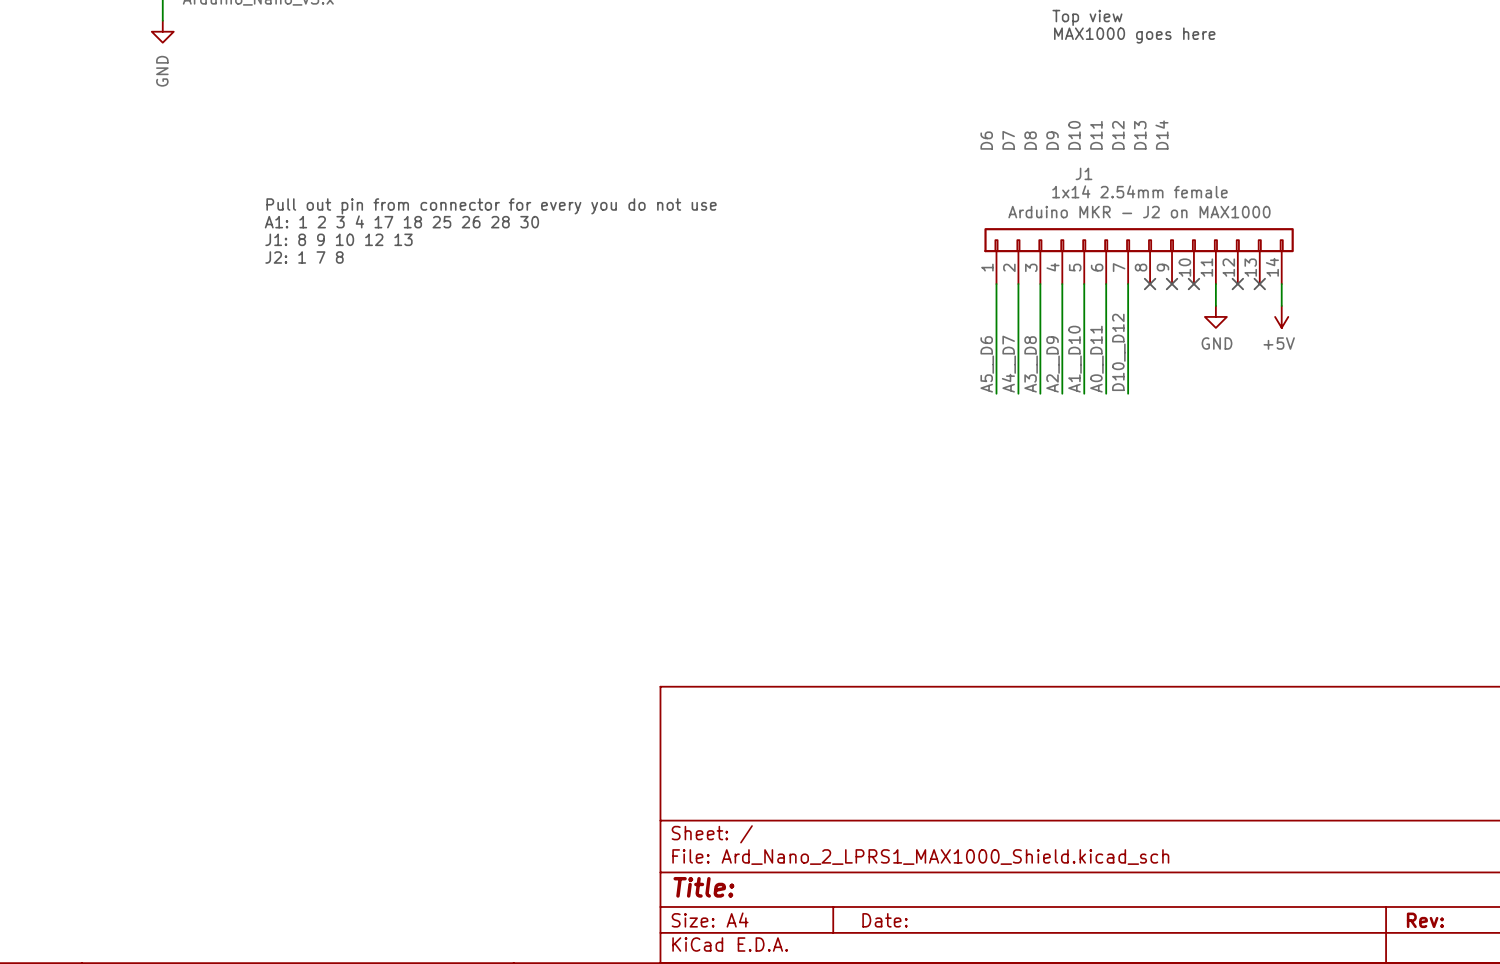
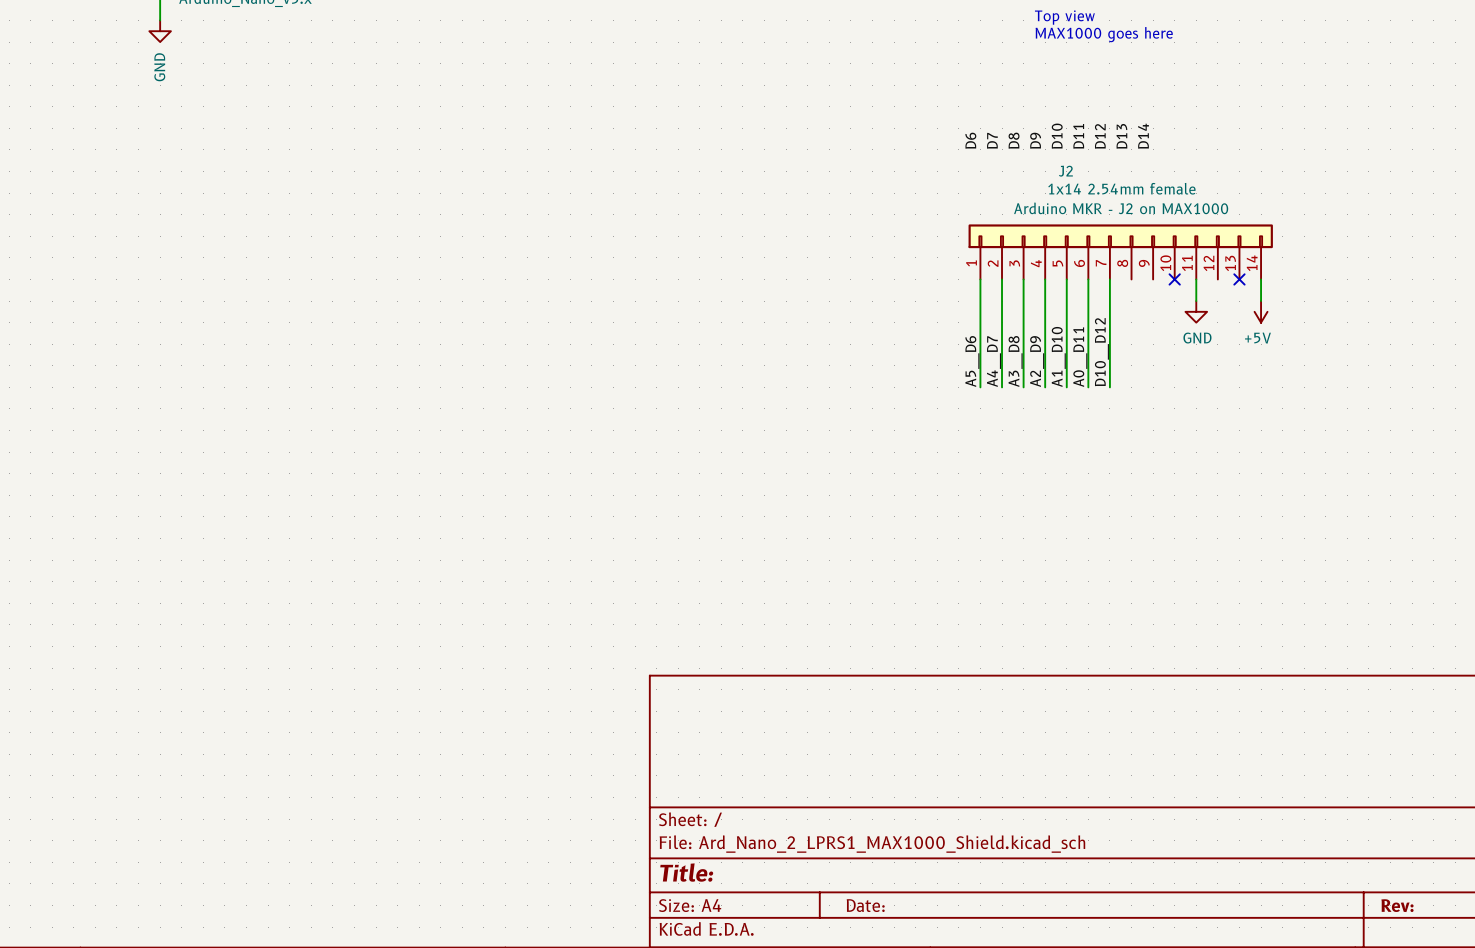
J1 name: J1 (1083, 173) -> J2 (1065, 171)
text: Pull out pin from connector for every you do not use (491, 206) -> none
text: A1: 1 2 3 4 17 18 25 26 28 30 (401, 221) -> none
text: J1: 8 9 10 12 13 (339, 239) -> none
text: J2: 1 7 8 (304, 257) -> none
no-connect mark: (1150, 284) -> none
no-connect mark: (1172, 284) -> none
no-connect mark: (1237, 284) -> none

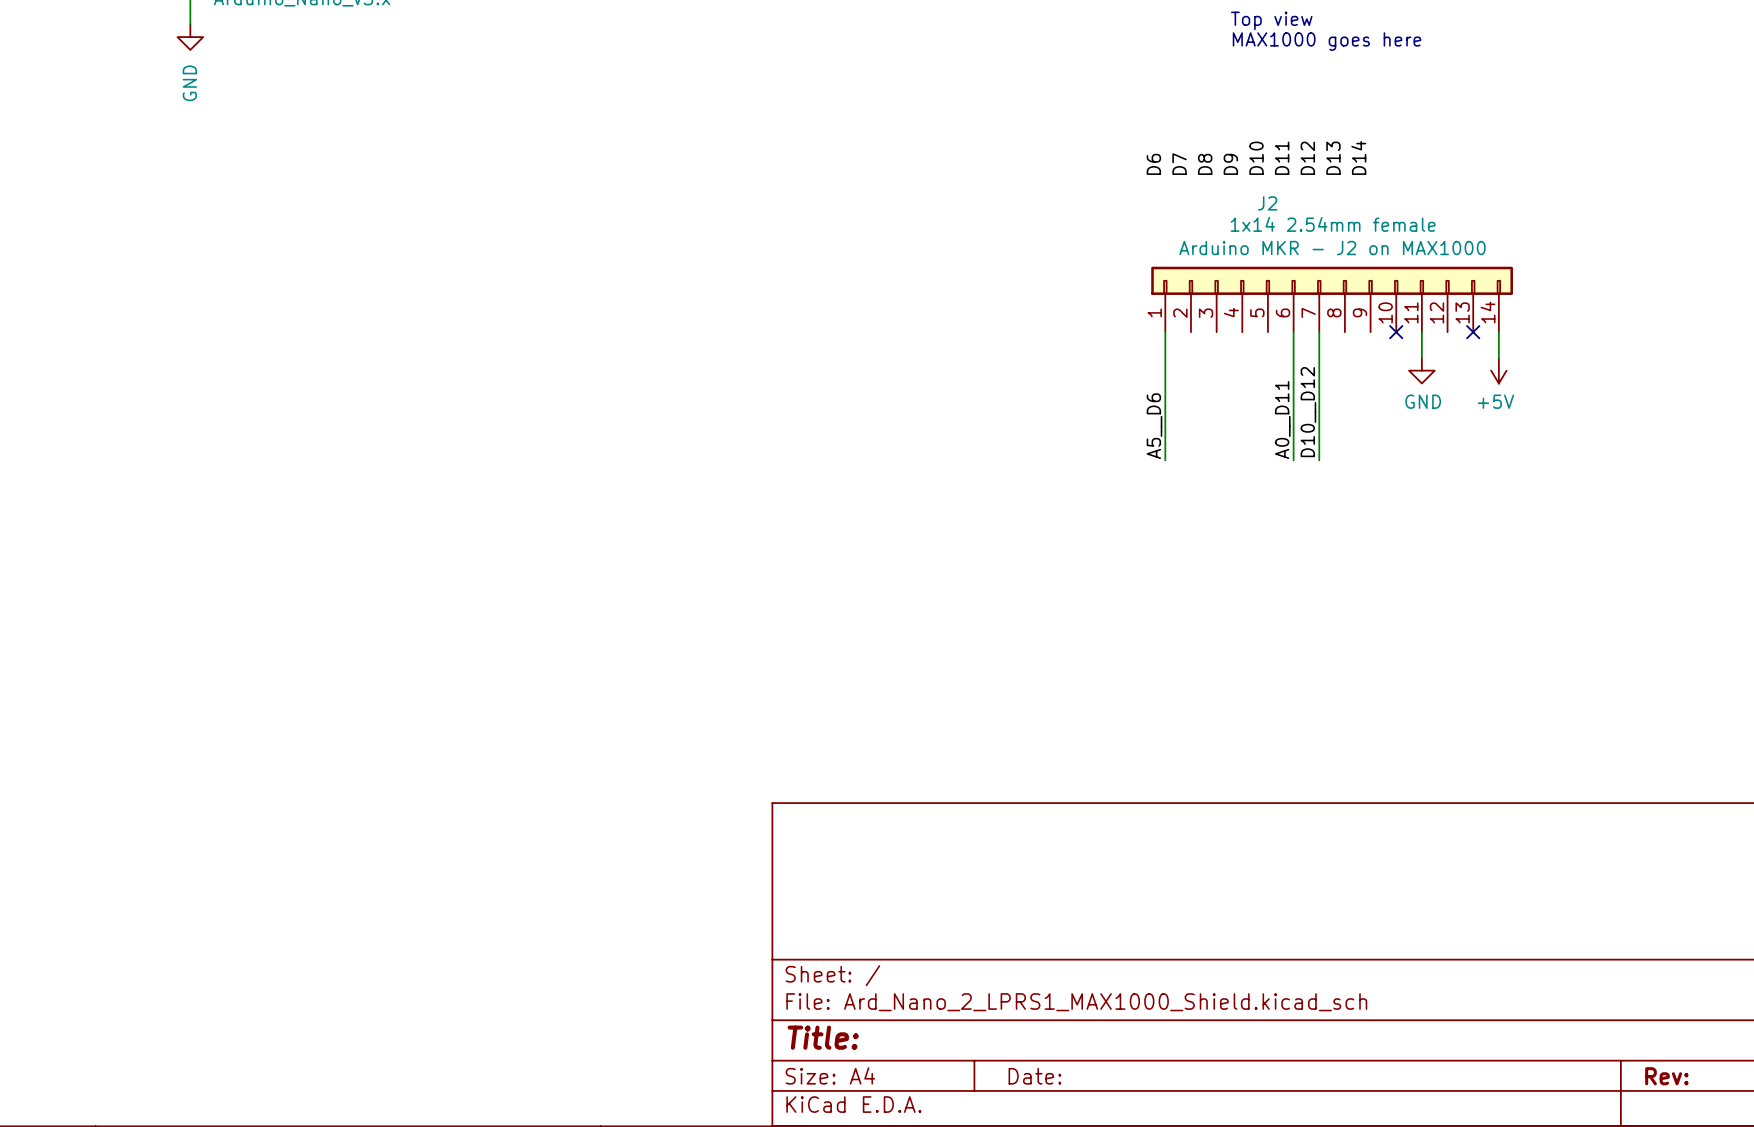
wire: (1002, 279) (1002, 387) -> none
wire: (1023, 279) (1023, 387) -> none
wire: (1045, 279) (1045, 387) -> none
wire: (1066, 279) (1066, 387) -> none
label: A1__D10 (1058, 356) -> none
label: A4__D7 (993, 361) -> none
label: A3__D8 (1015, 361) -> none
label: A2__D9 (1037, 361) -> none

